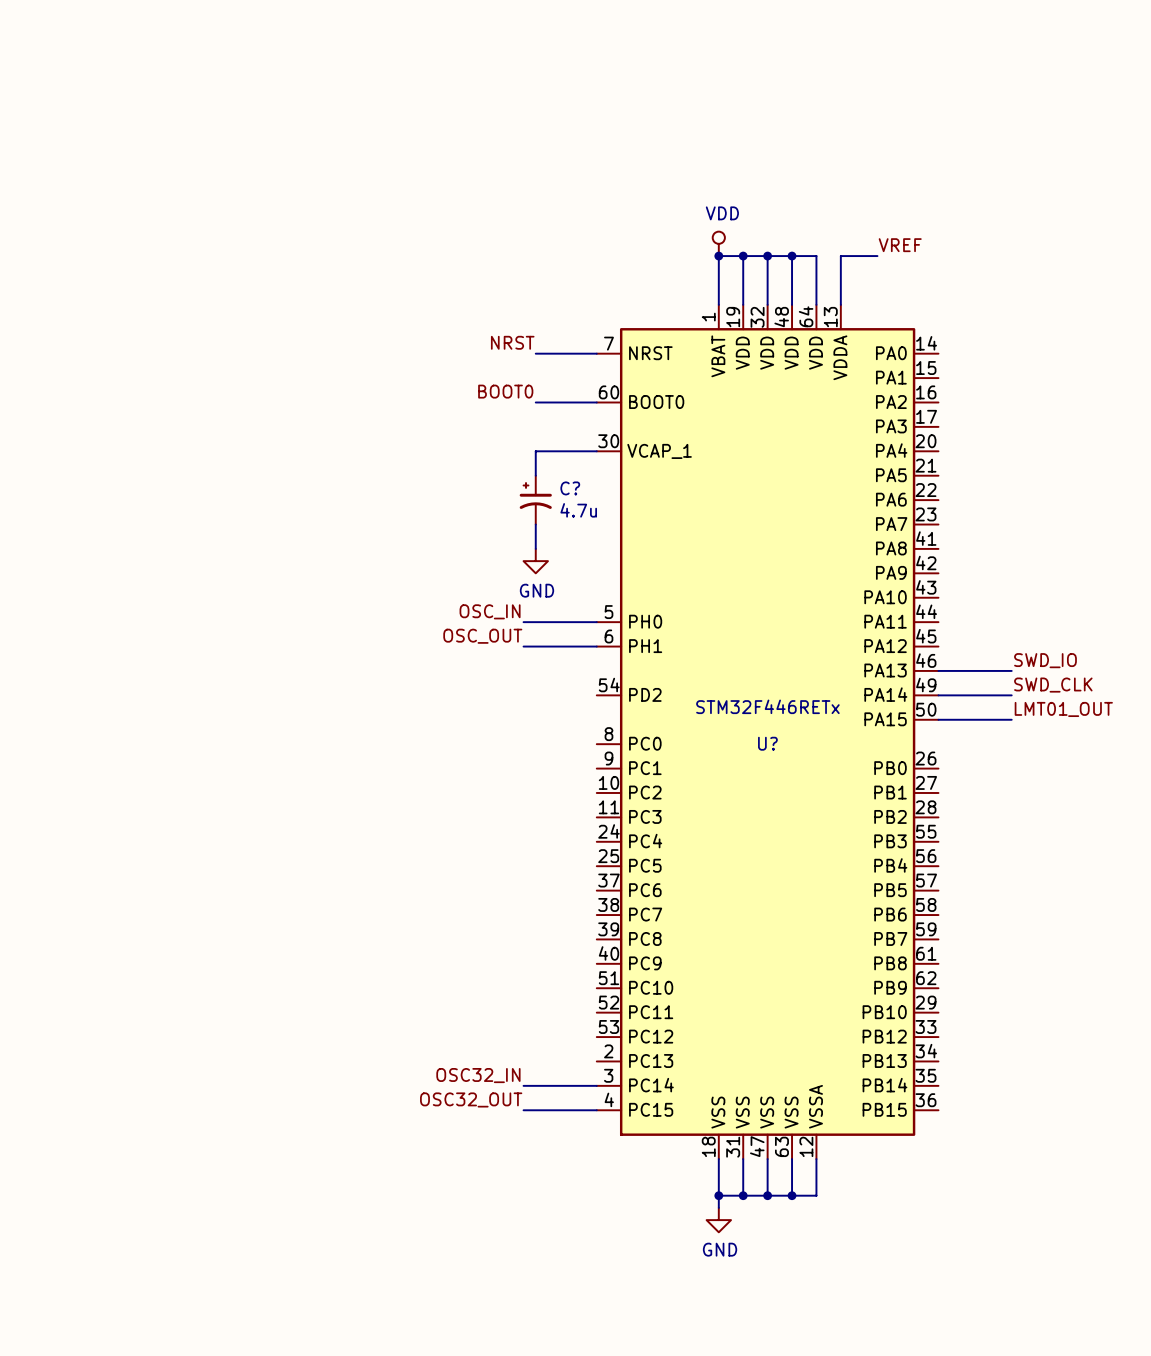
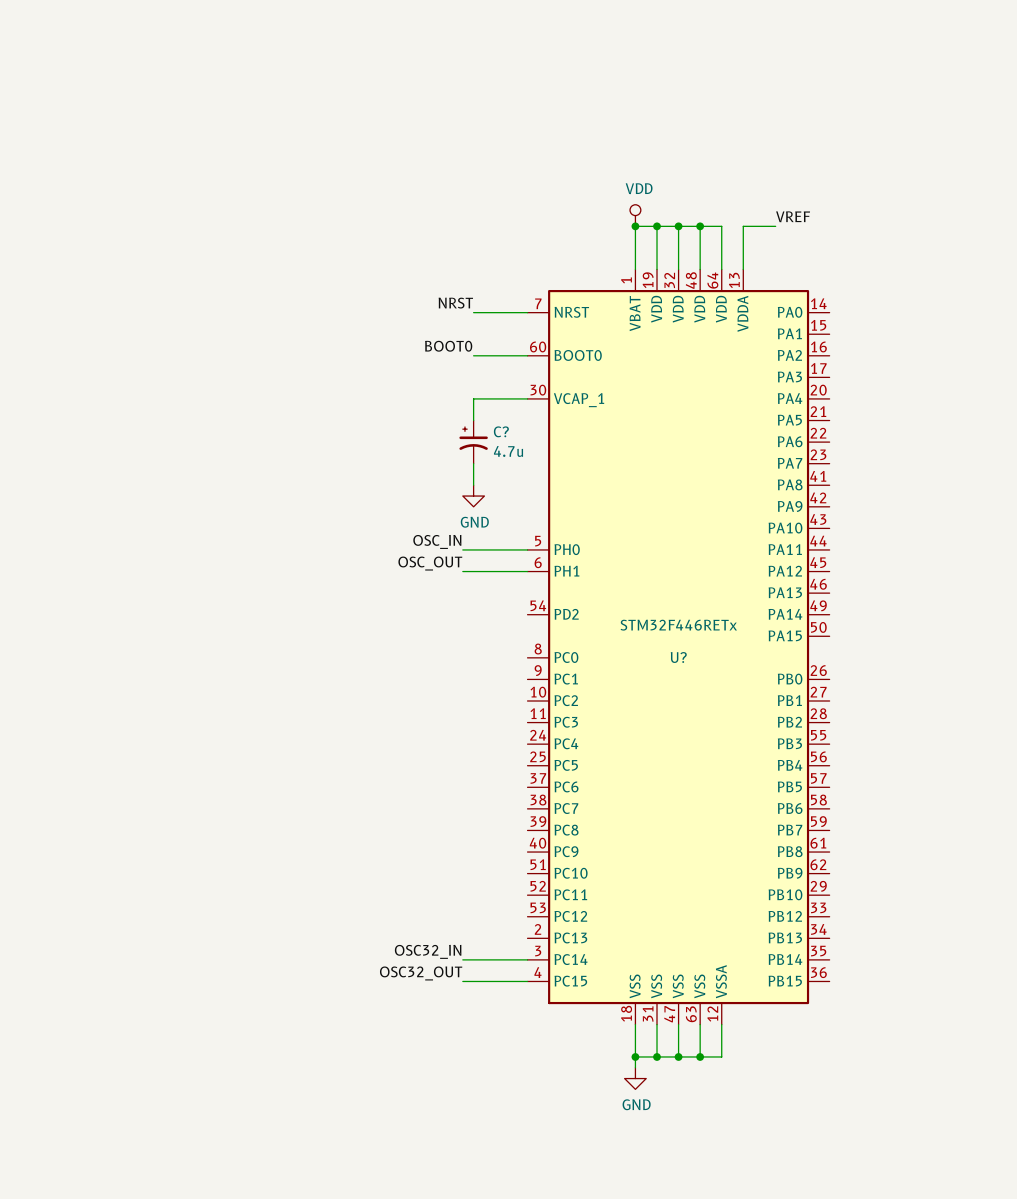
label: SWD_IO (1045, 660) -> none
wire: (938, 670) (1011, 670) -> none
label: SWD_CLK (1053, 685) -> none
wire: (938, 695) (1011, 695) -> none
label: LMT01_OUT (1063, 709) -> none
wire: (938, 719) (1011, 719) -> none

